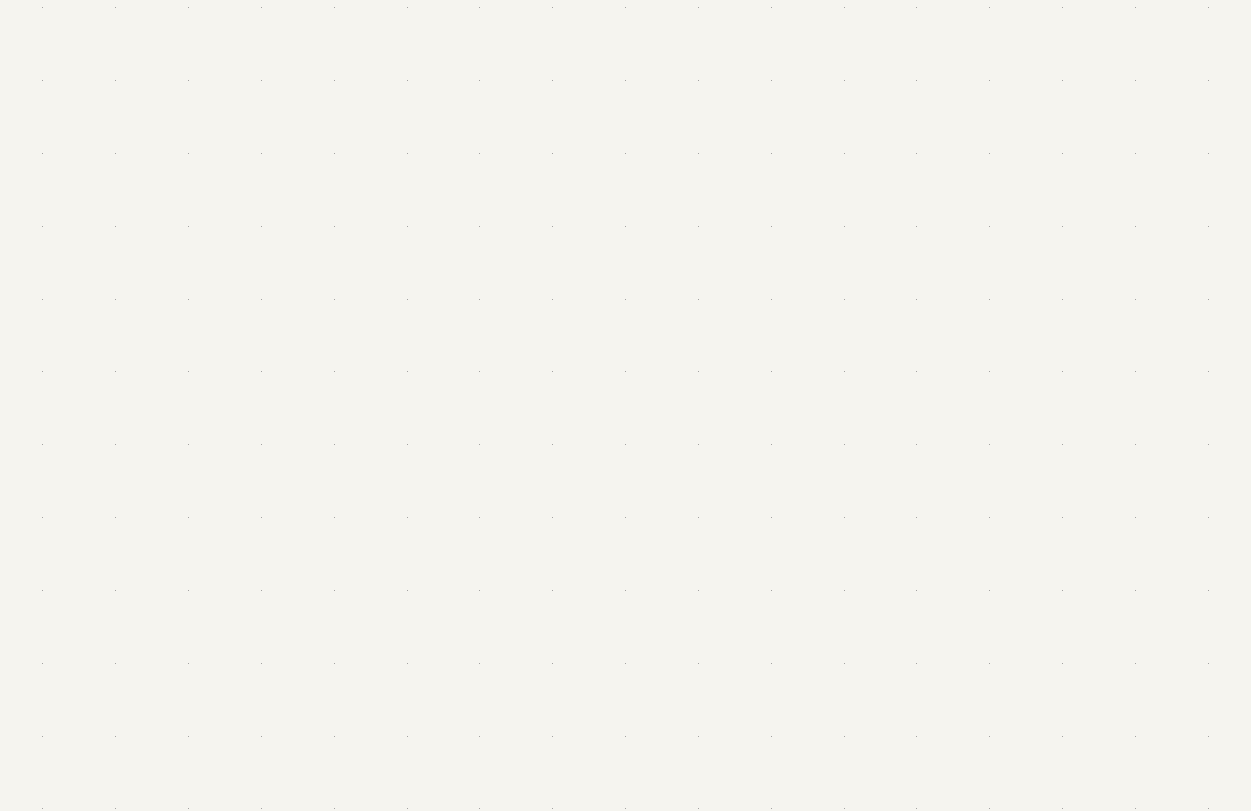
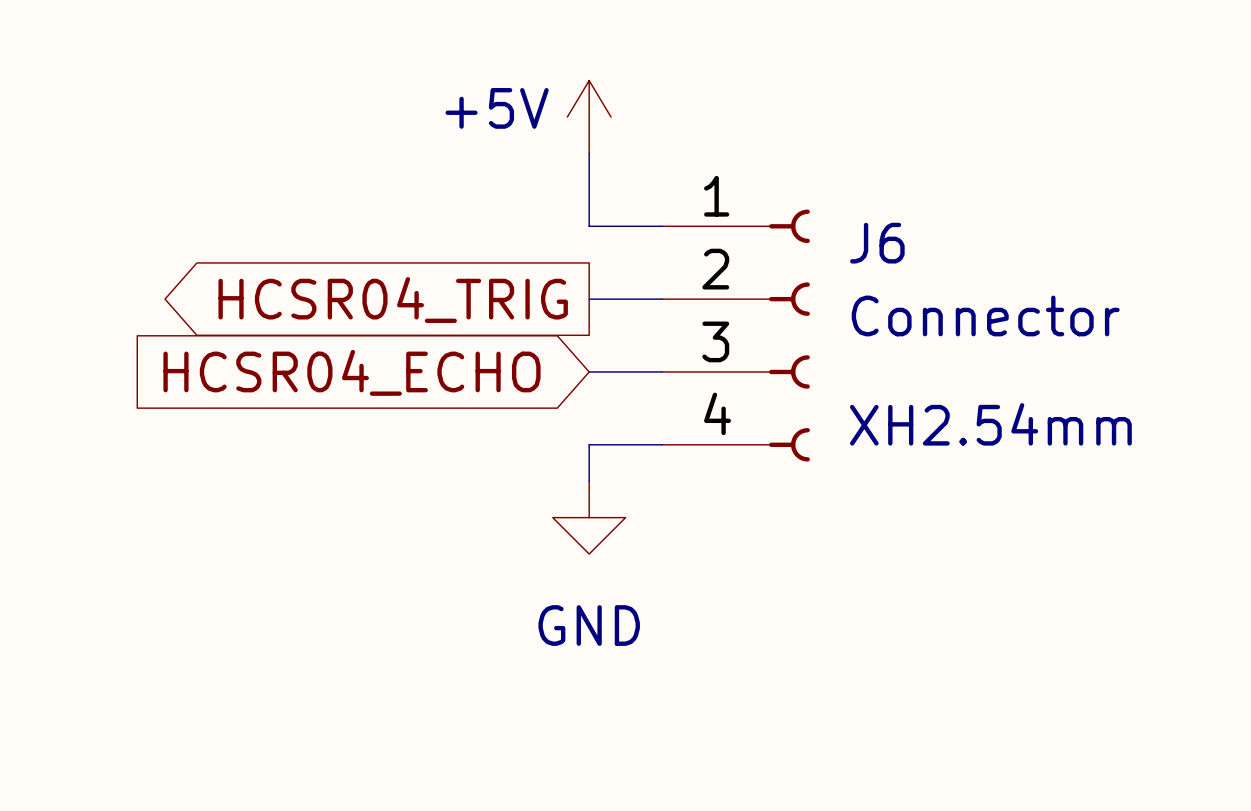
power symbol: none -> +5V (589, 117)
wire: none -> (589, 153) (589, 226) (662, 226)
wire: none -> (589, 299) (662, 299)
global label: none -> HCSR04_TRIG (393, 300)
J6: none -> Connector (735, 335)
wire: none -> (589, 371) (662, 371)
global label: none -> HCSR04_ECHO (351, 372)
wire: none -> (662, 444) (589, 444) (589, 481)
power symbol: none -> GND (589, 517)

